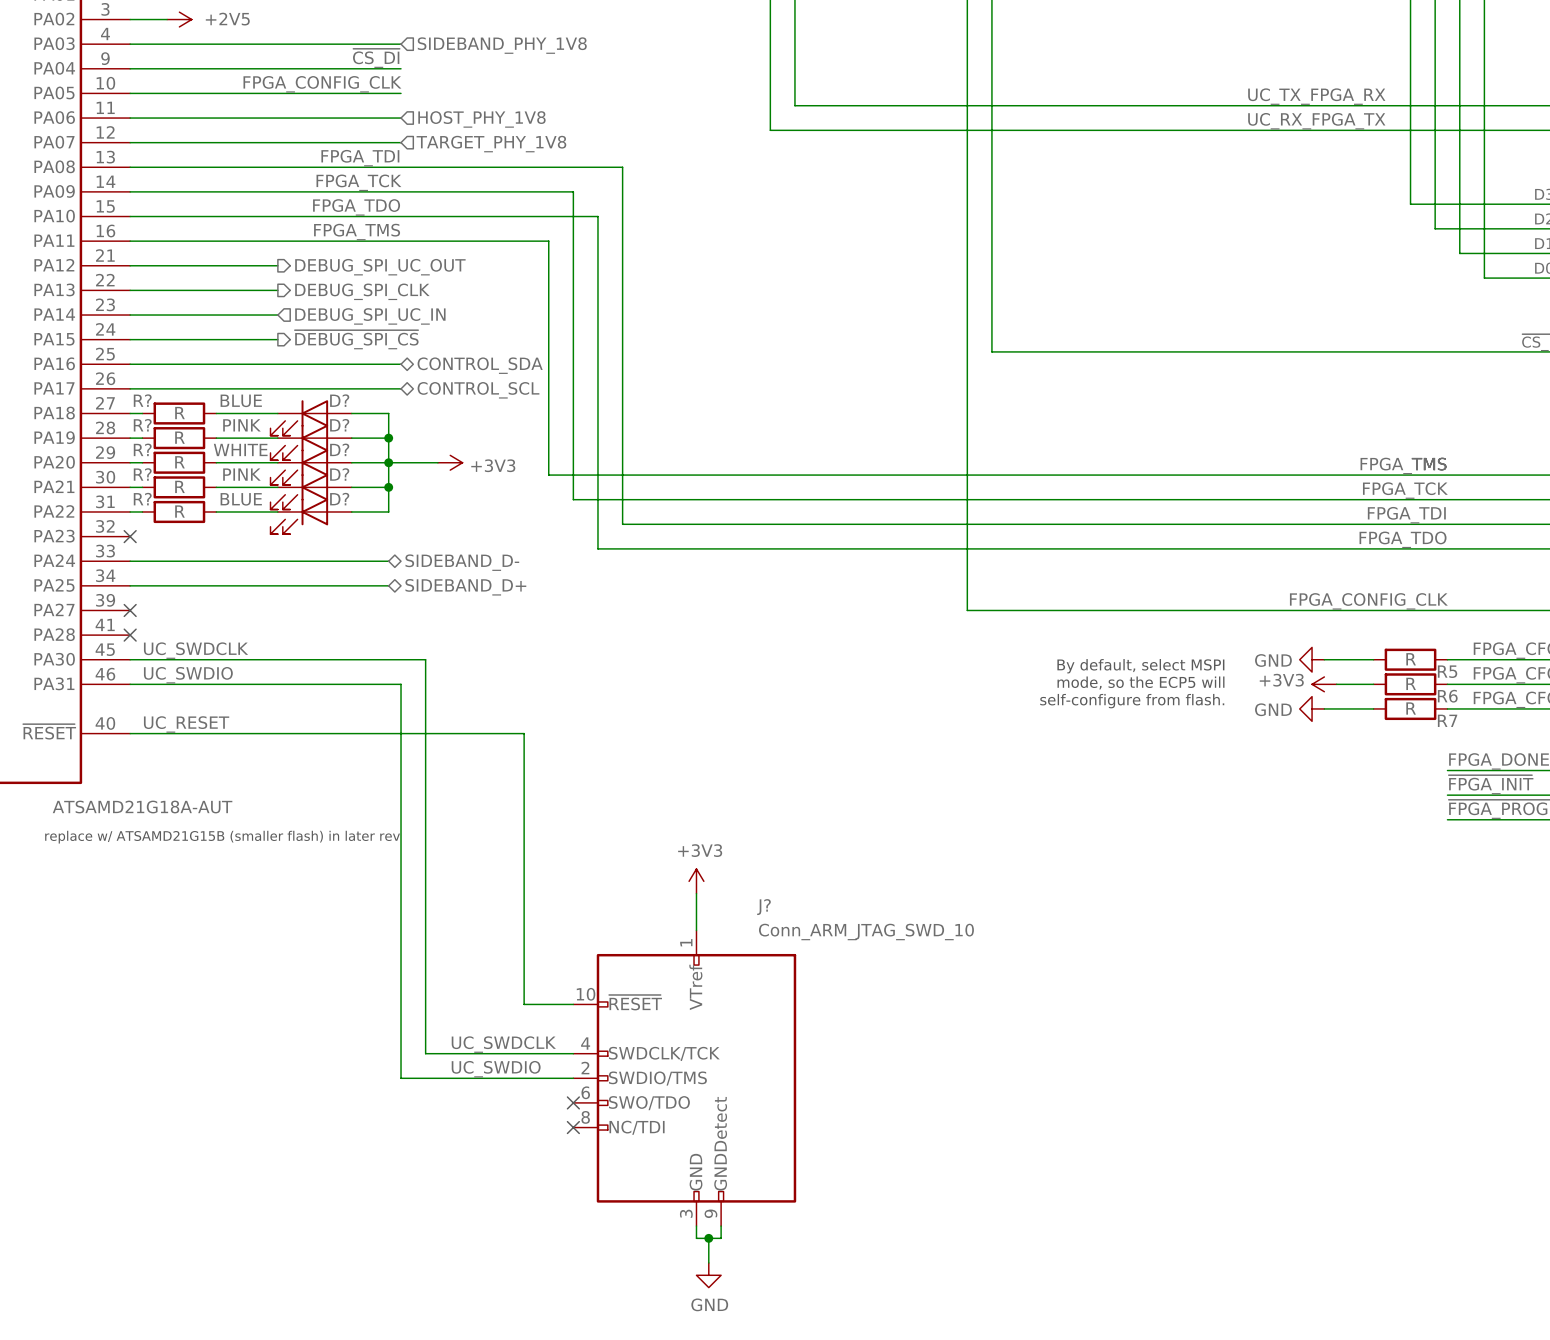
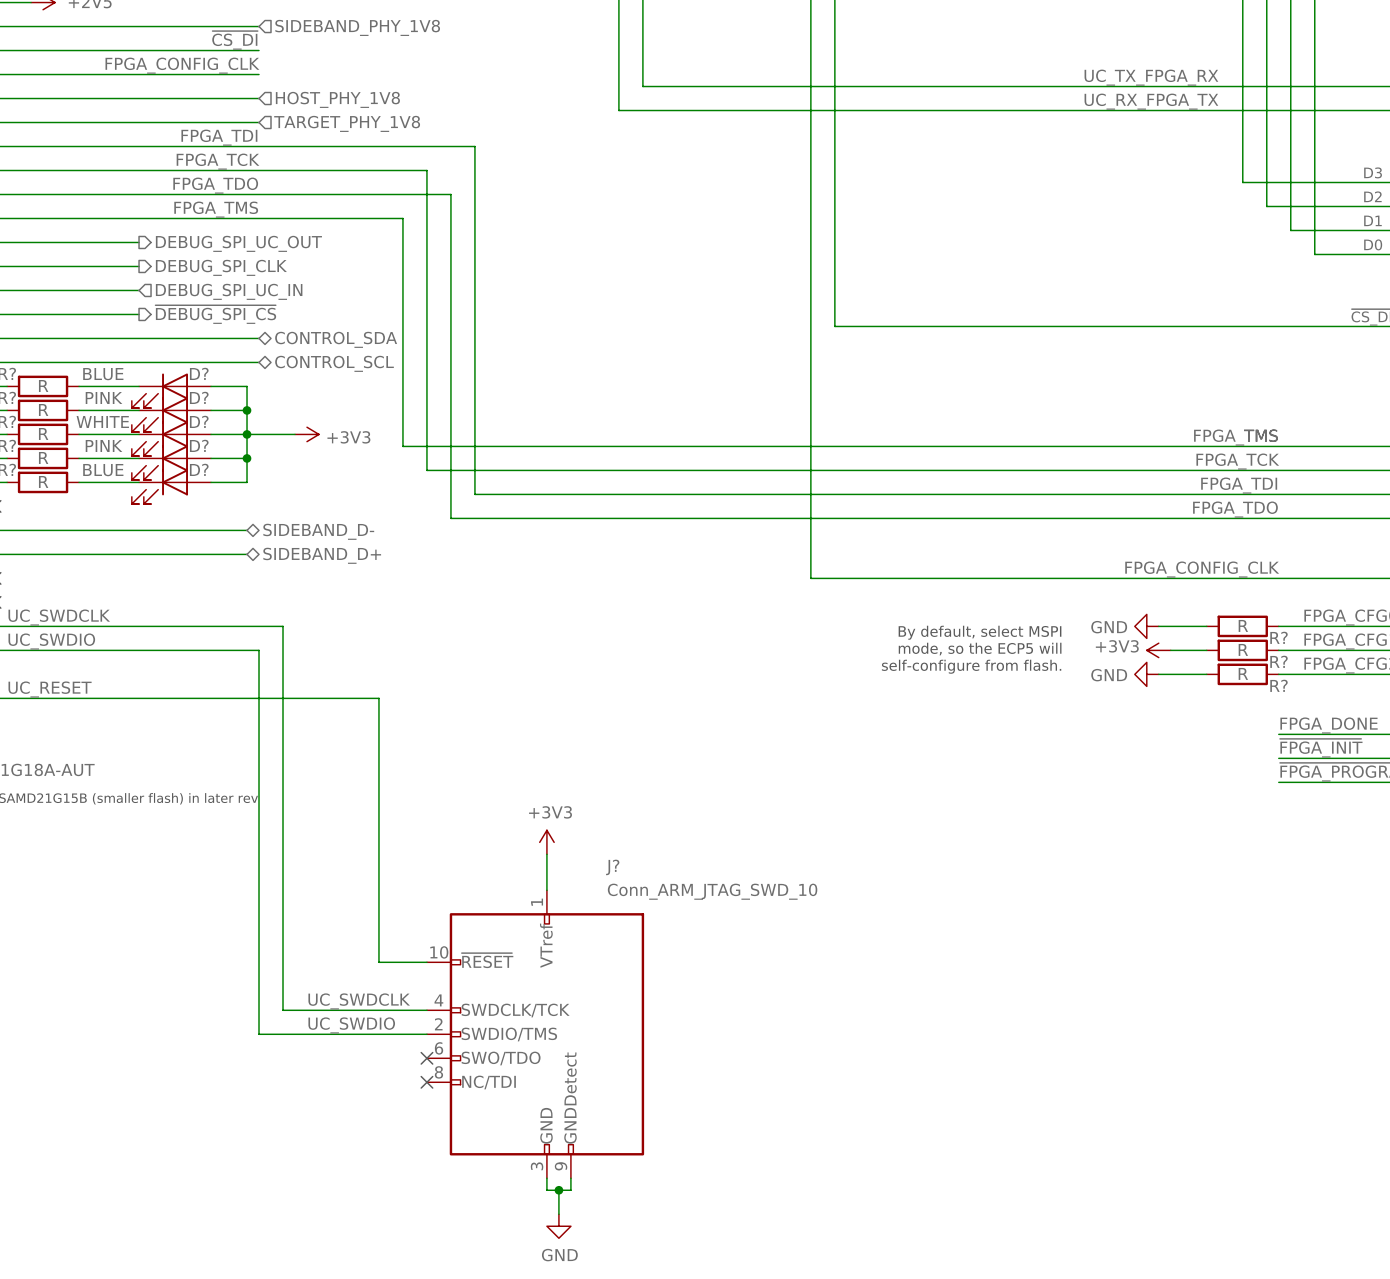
R5 name: R5 (1447, 671) -> R? (1279, 637)
R6 name: R6 (1447, 696) -> R? (1279, 661)
R7 name: R7 (1447, 720) -> R? (1279, 685)

